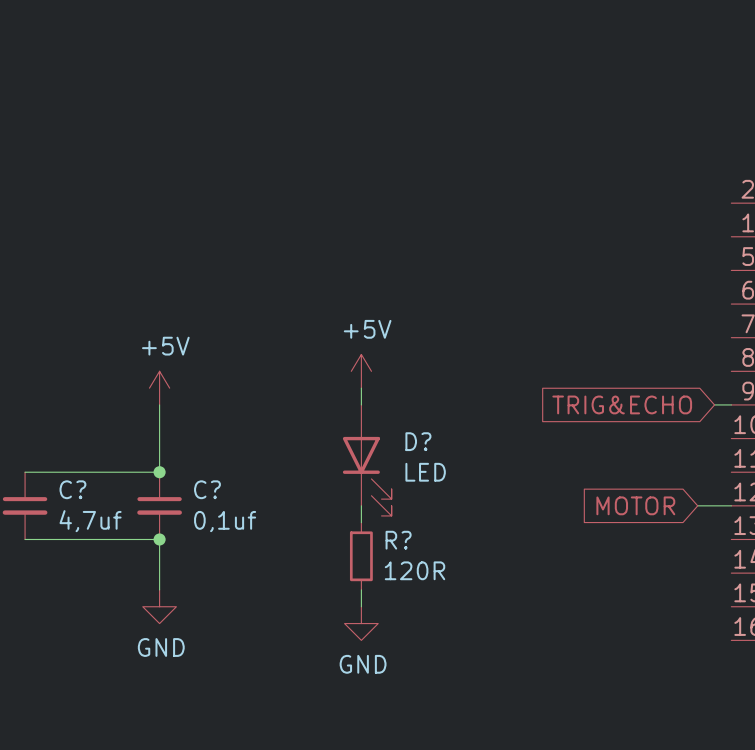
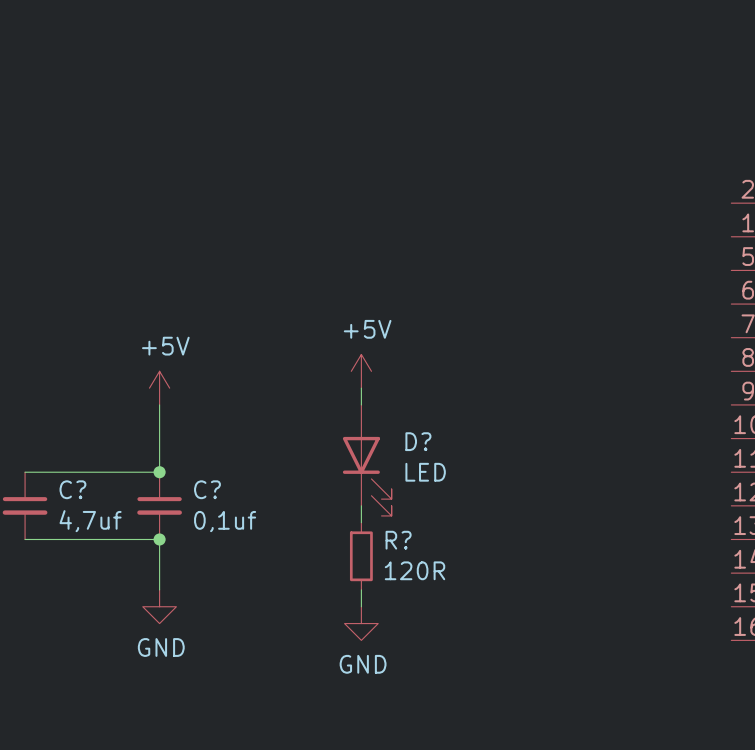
global label: TRIG&ECHO (622, 404) -> none
wire: (714, 404) (731, 404) -> none
global label: MOTOR (635, 505) -> none
wire: (697, 505) (731, 505) -> none

